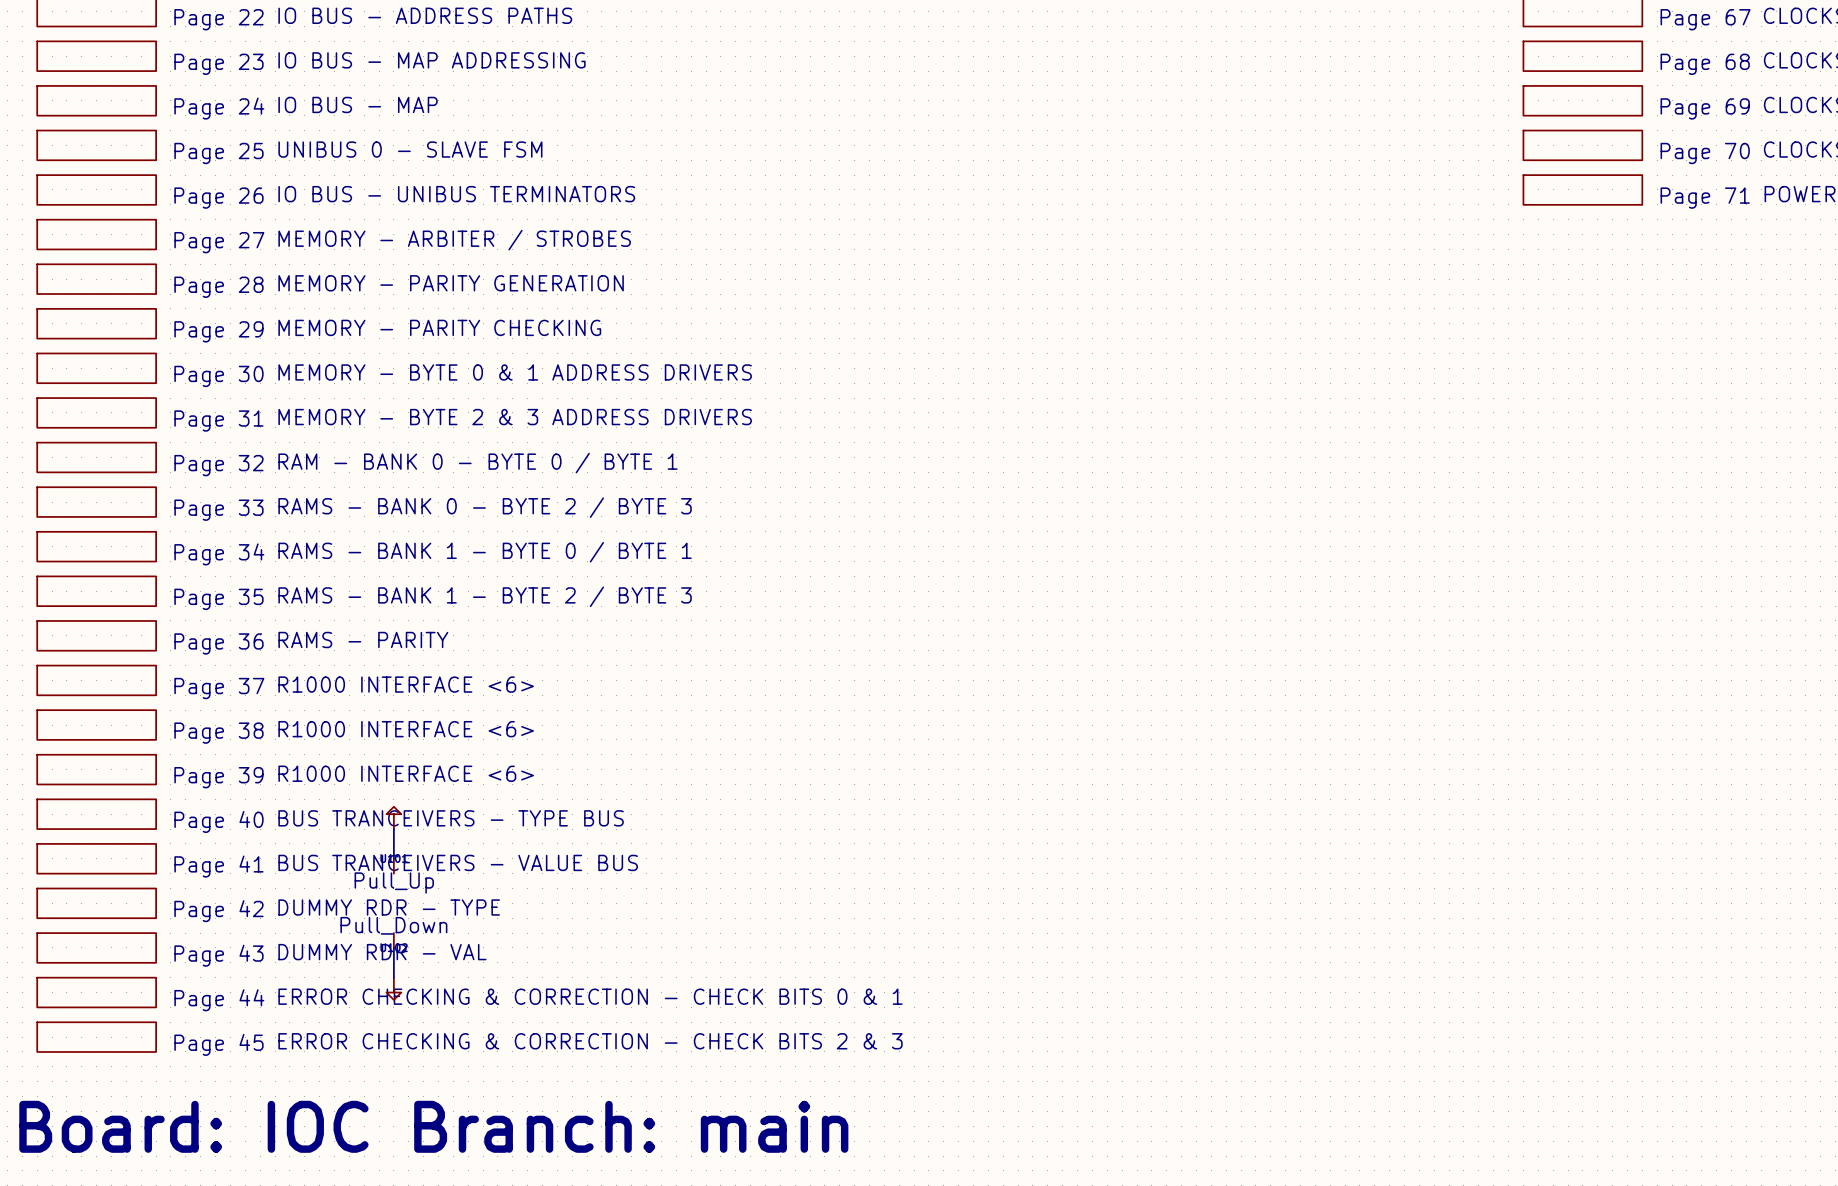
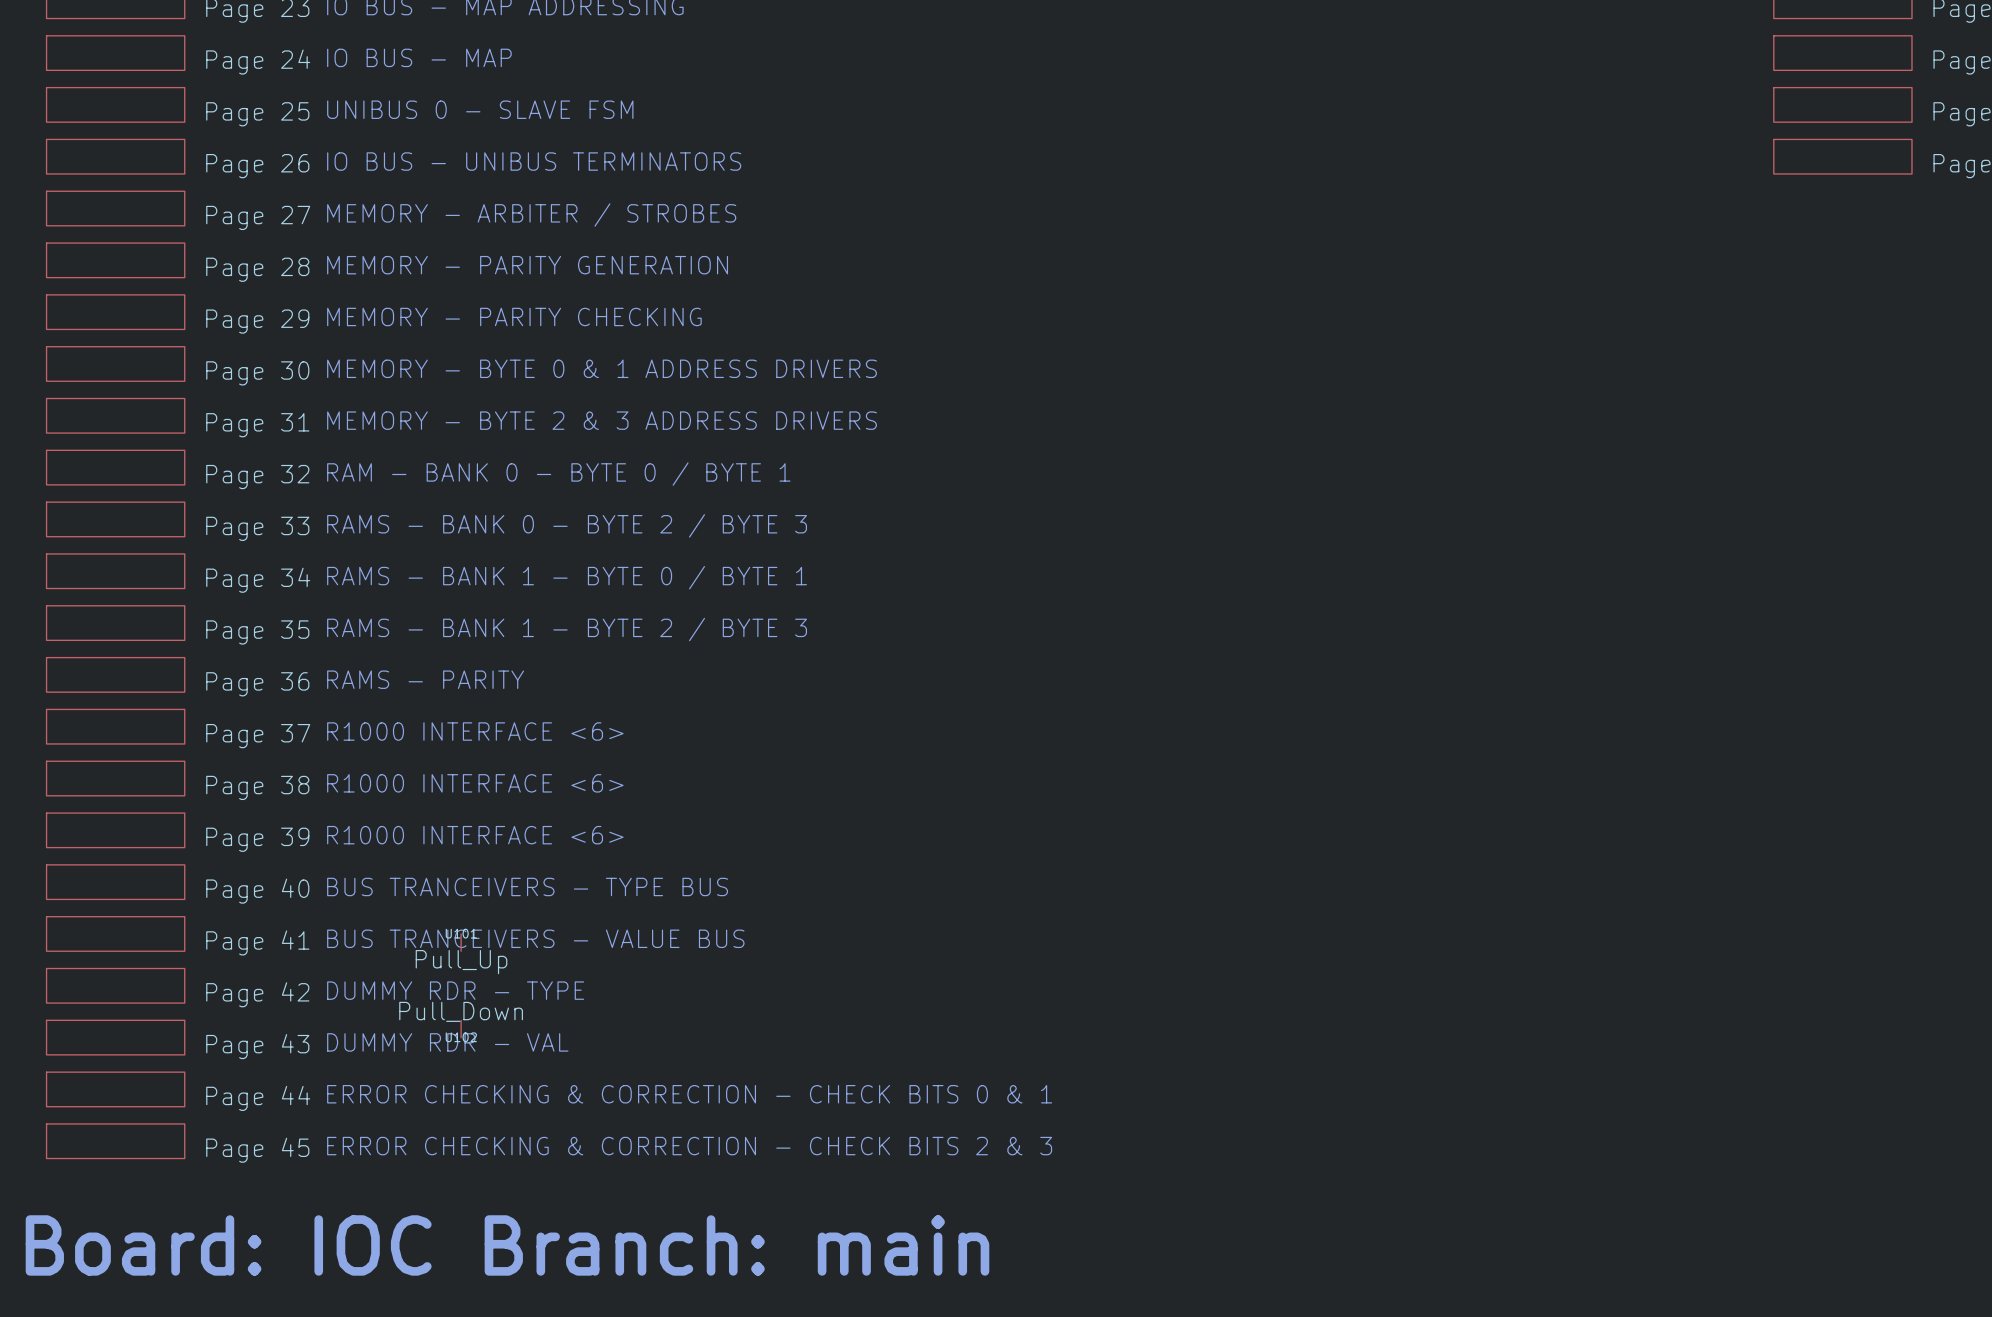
power symbol: (393, 817) -> none
wire: (393, 829) (393, 858) -> none
wire: (393, 947) (393, 977) -> none
power symbol: (393, 989) -> none

